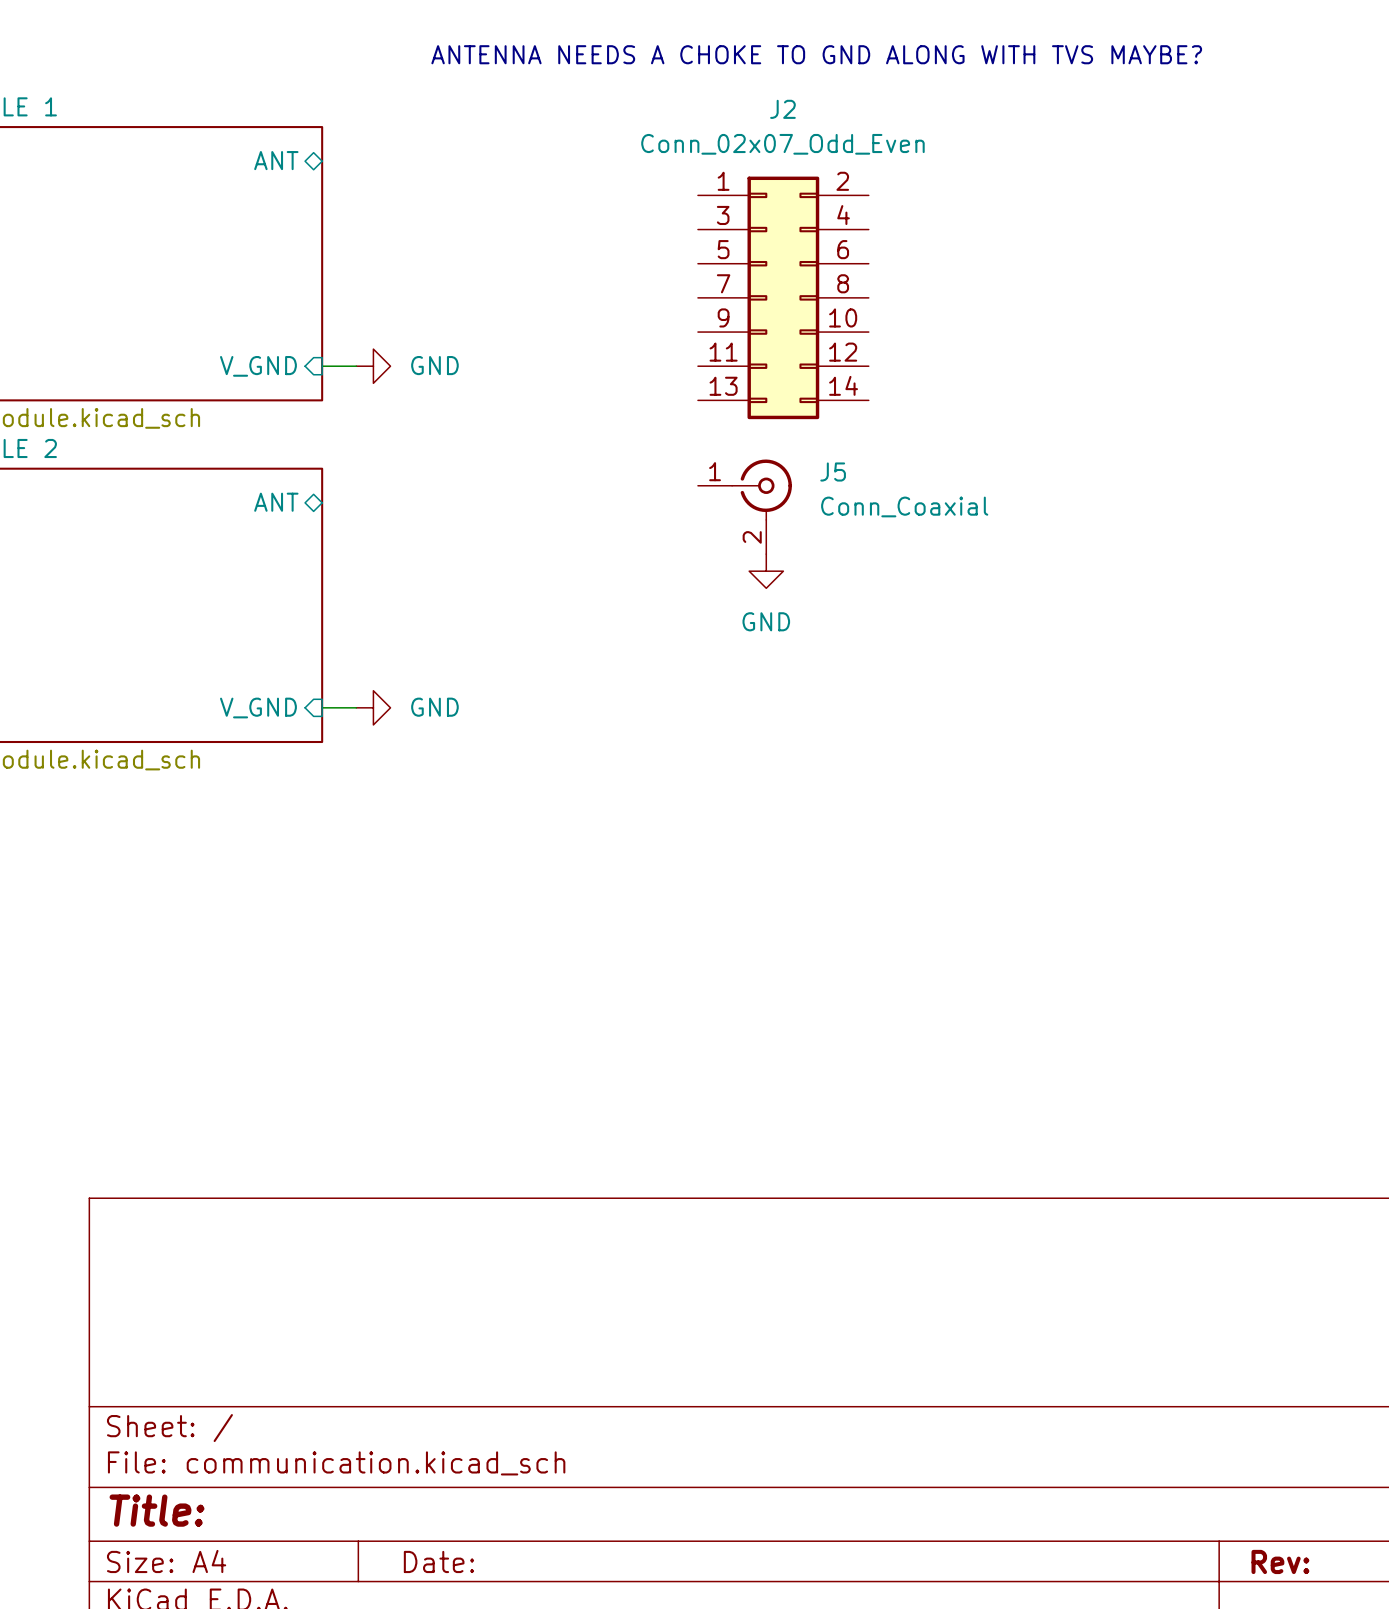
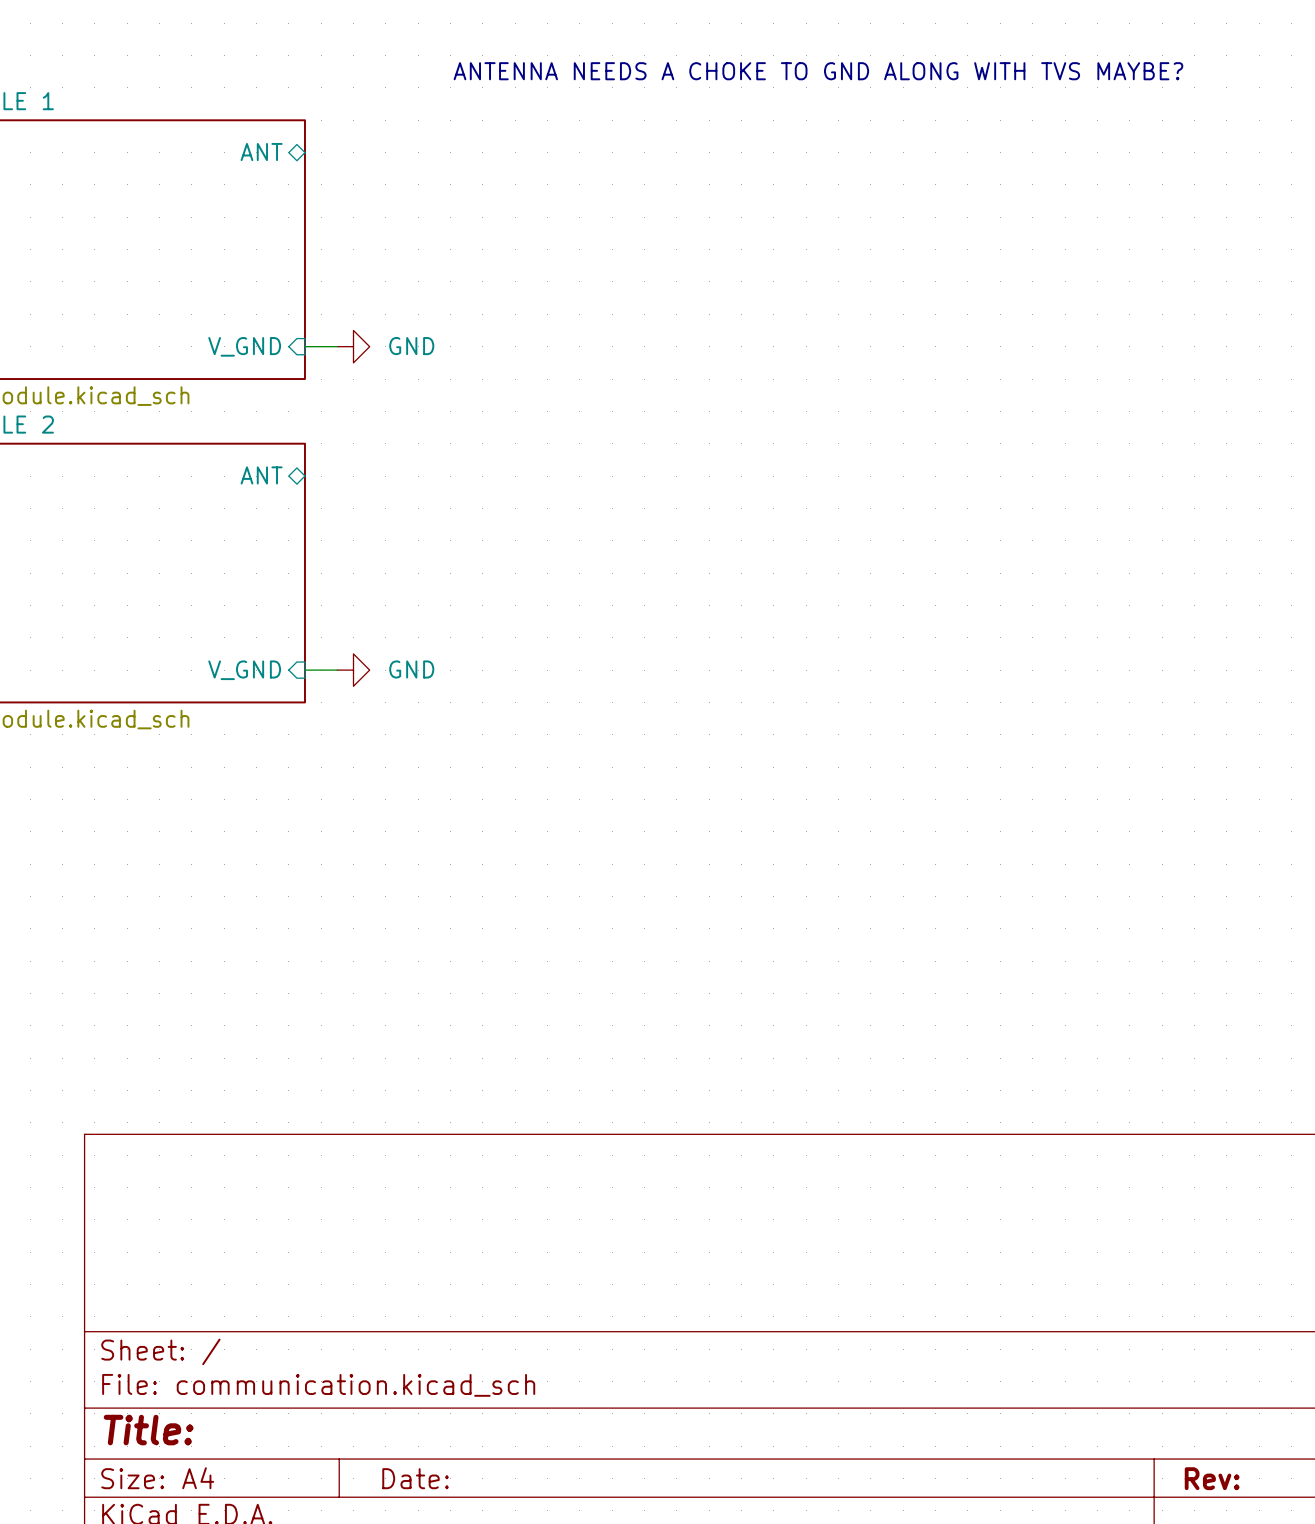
text position: ANTENNA NEEDS A CHOKE TO GND ALONG WITH TVS MAYBE? (816, 54) -> ANTENNA NEEDS A CHOKE TO GND ALONG WITH TVS MAYBE? (818, 71)
J2: Conn_02x07_Odd_Even (783, 297) -> none
J5: Conn_Coaxial (744, 506) -> none
power symbol: GND (766, 571) -> none

